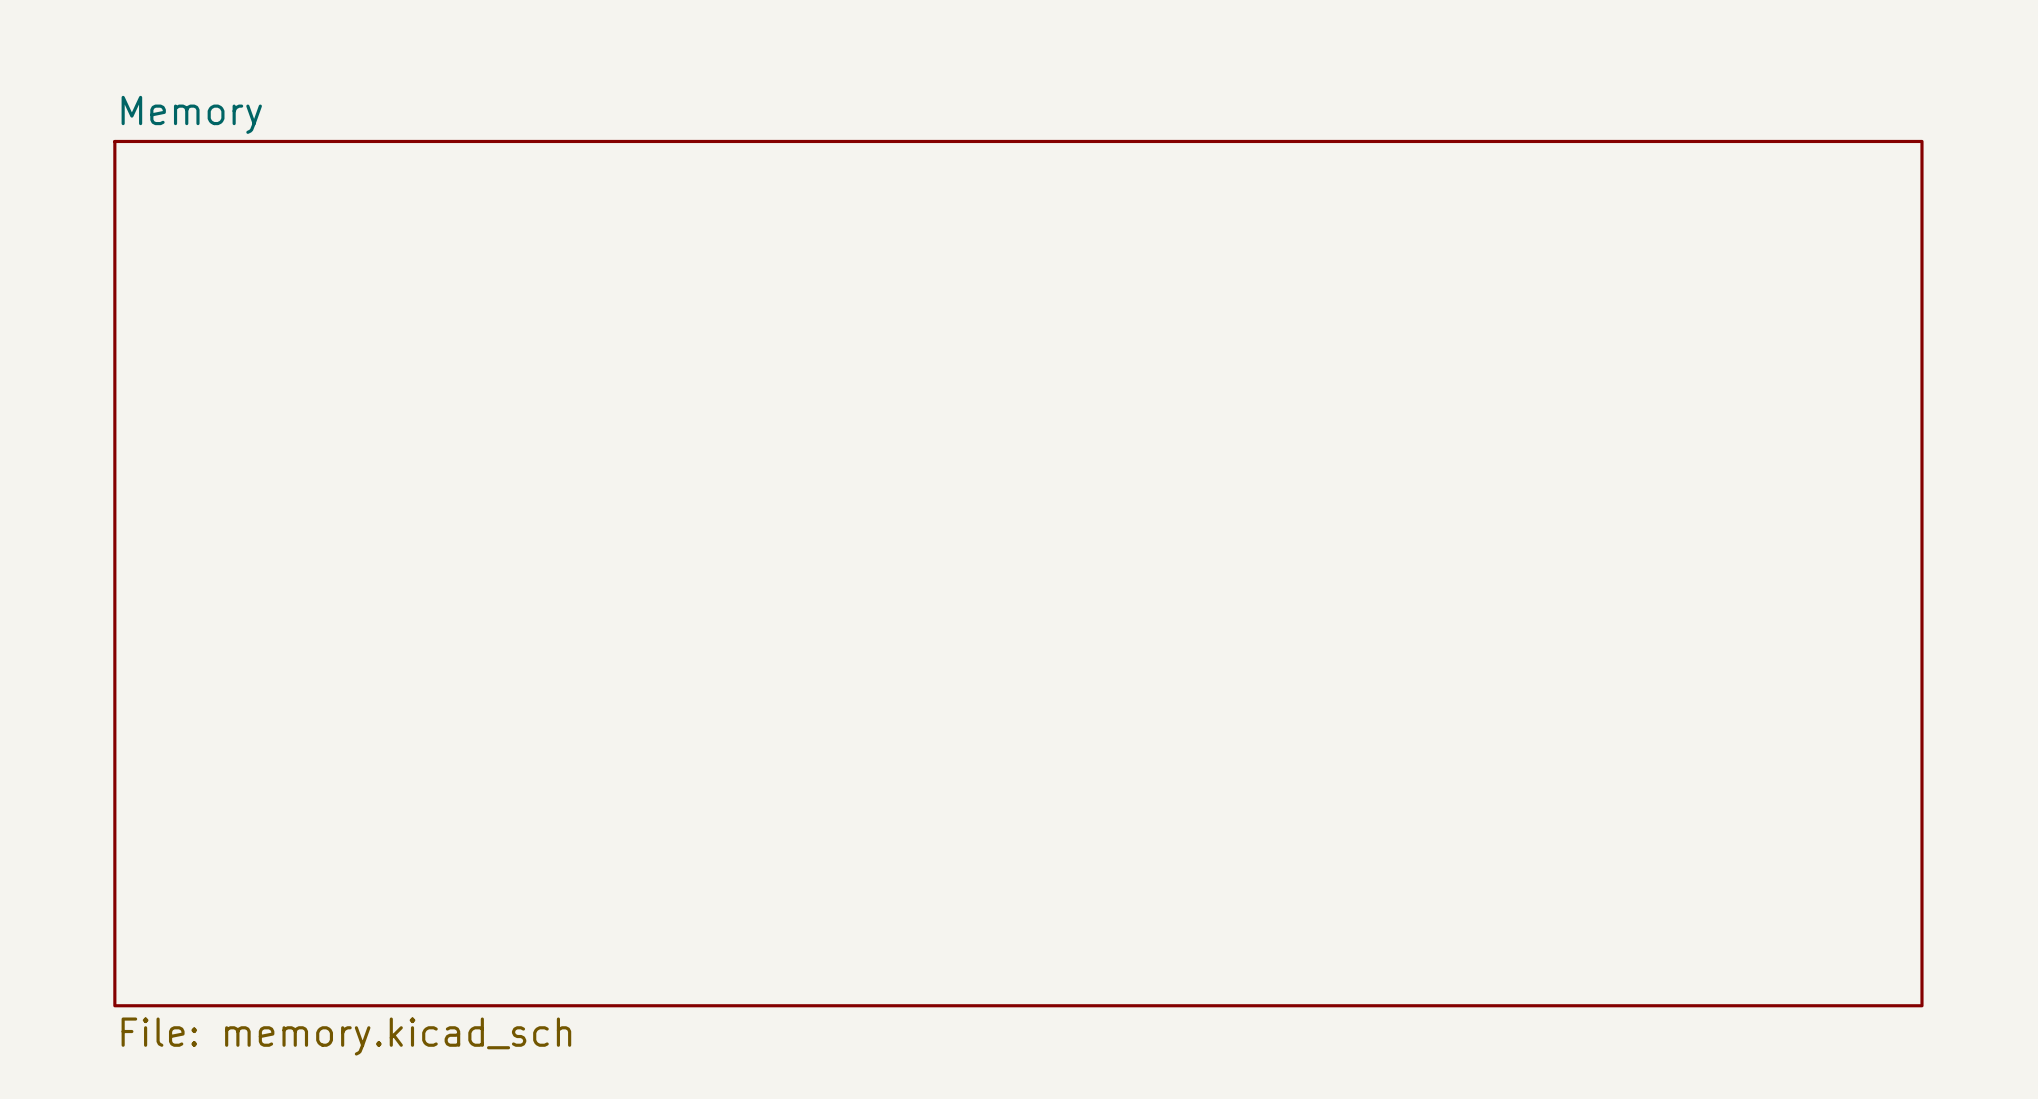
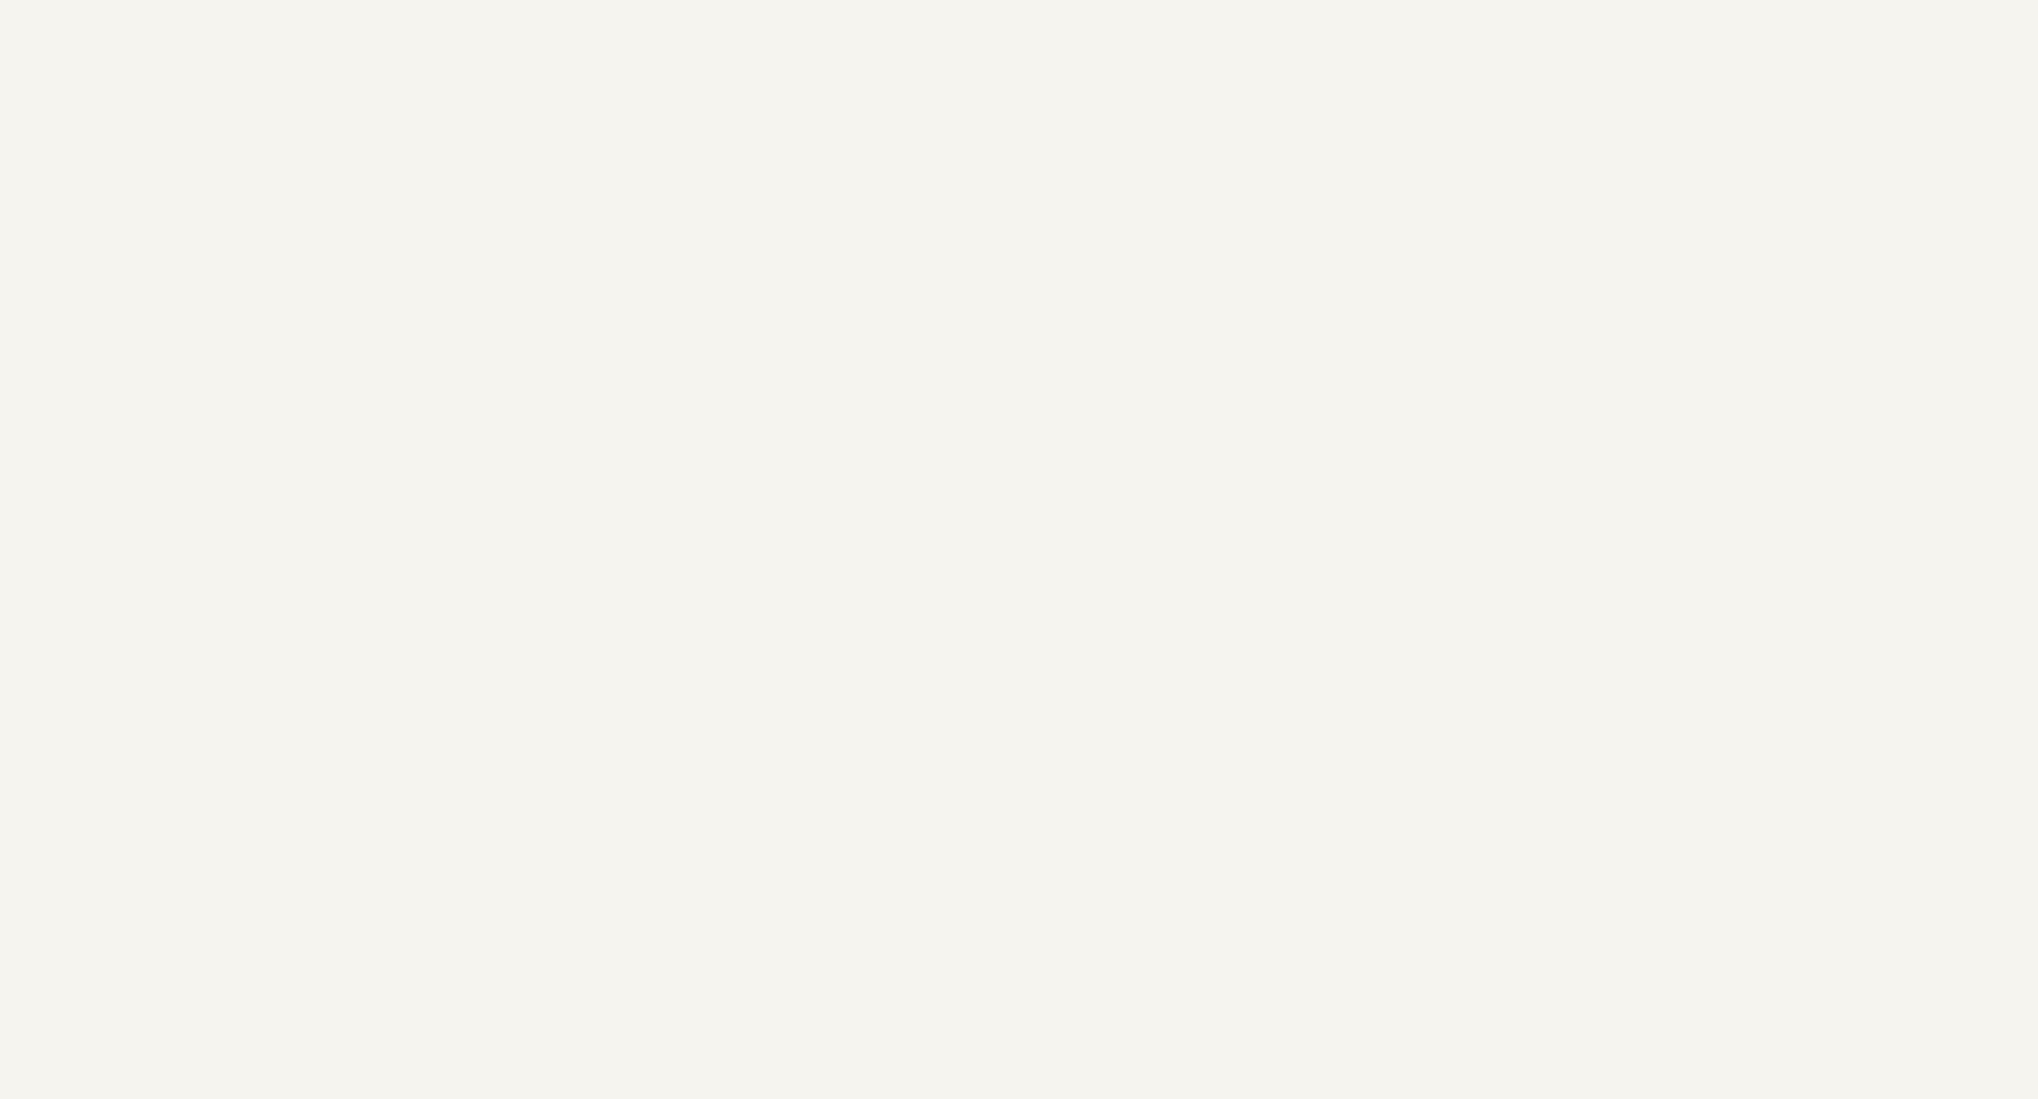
sheet Memory: File: memory.kicad_sch (1018, 573) -> none

